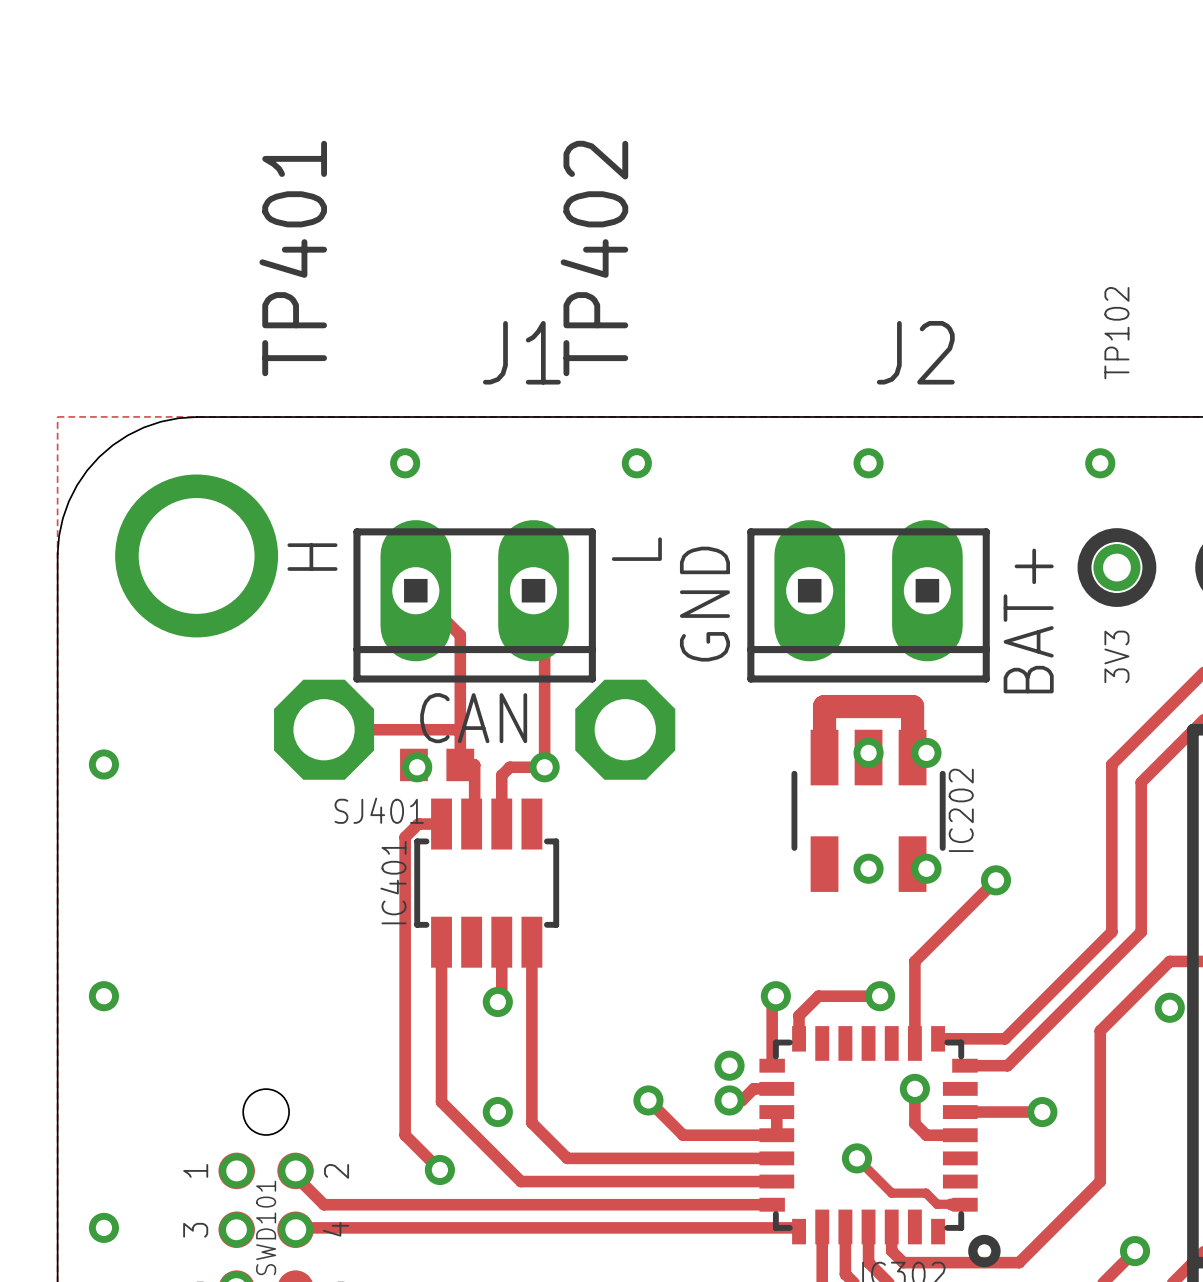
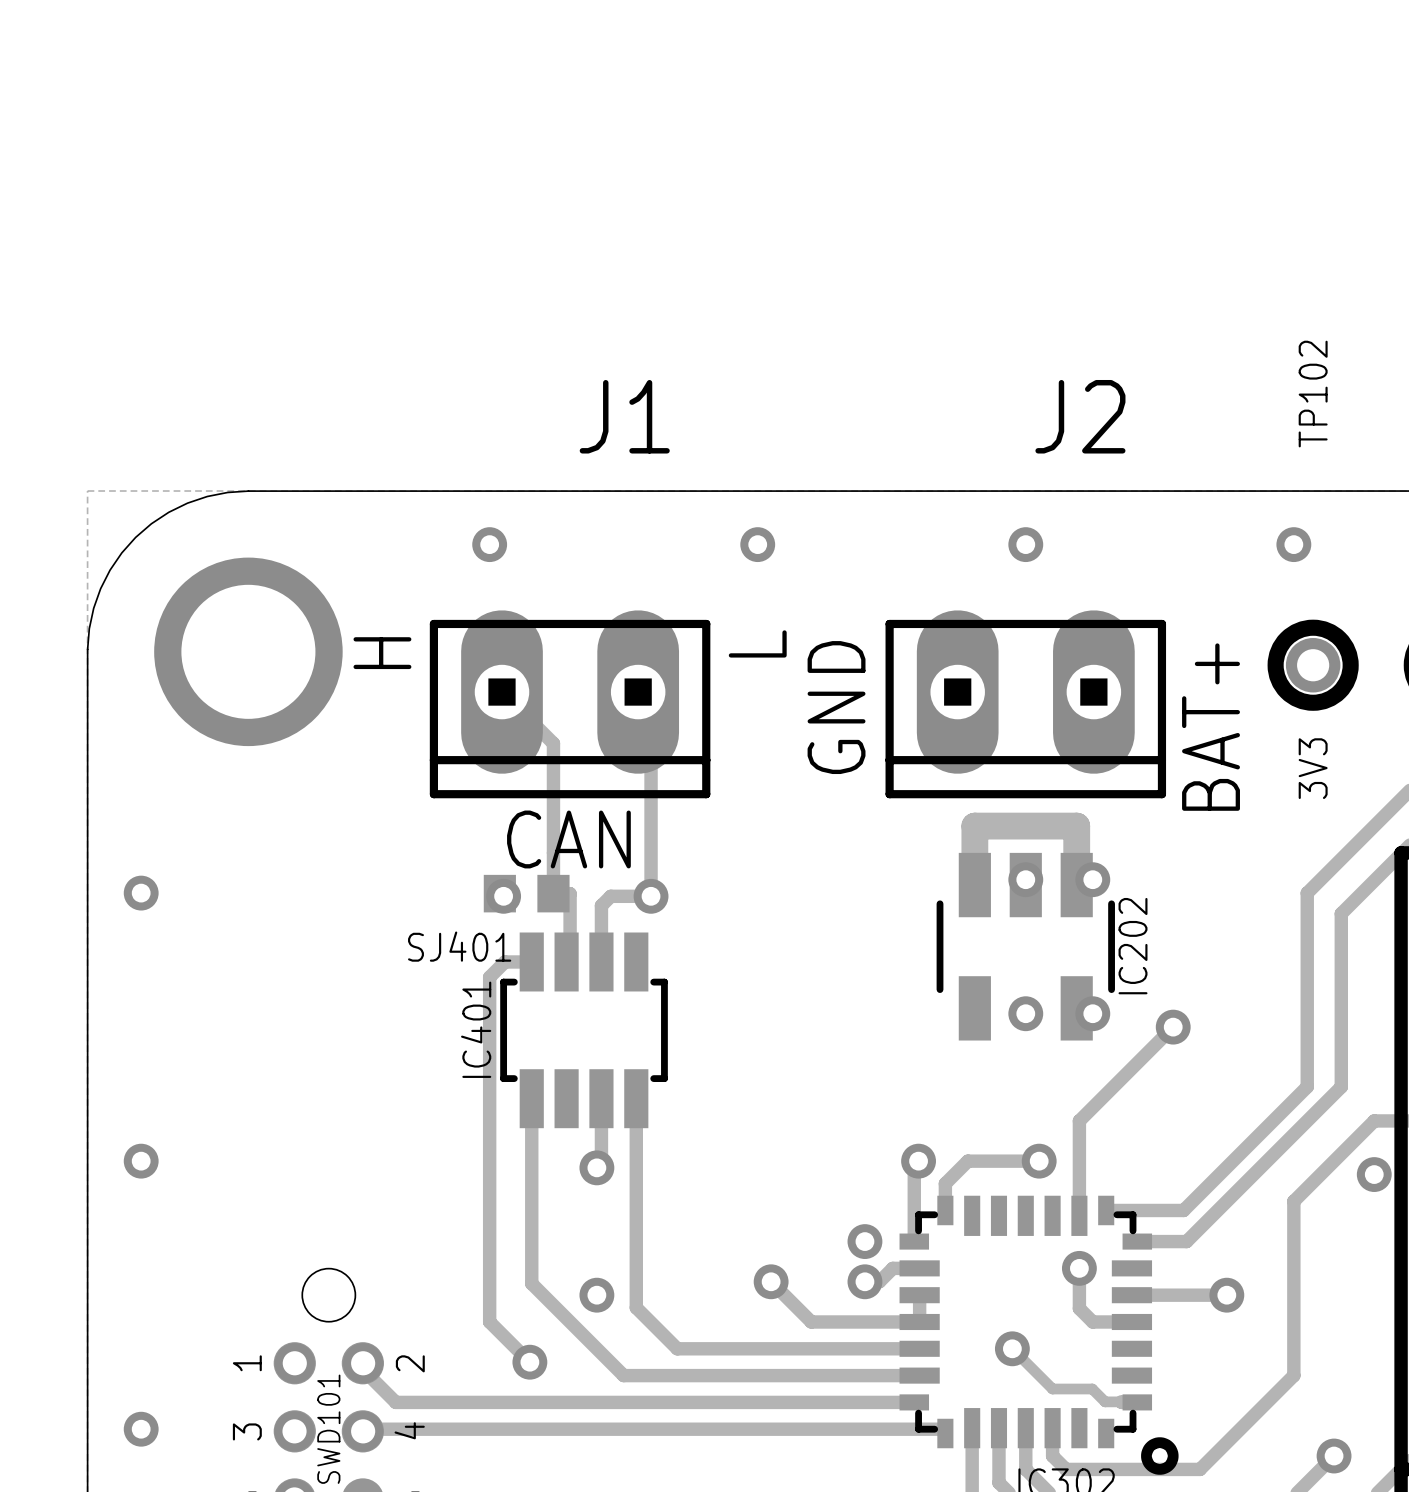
track: (324, 729) (460, 729) -> none
TP401: (324, 729) -> none
TP402: (625, 729) -> none

